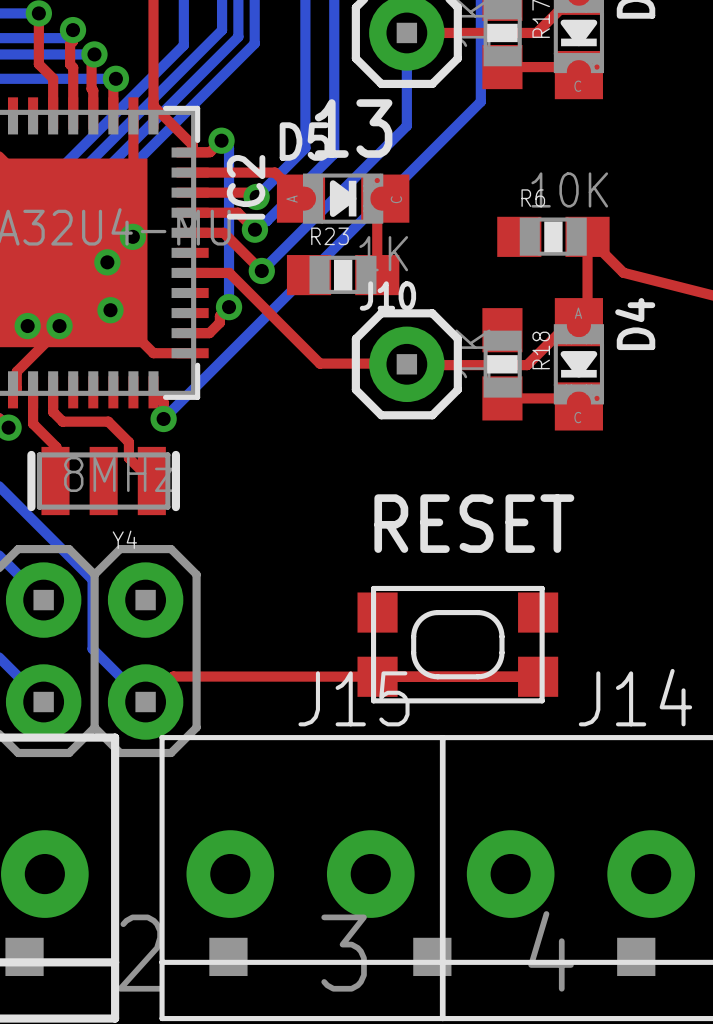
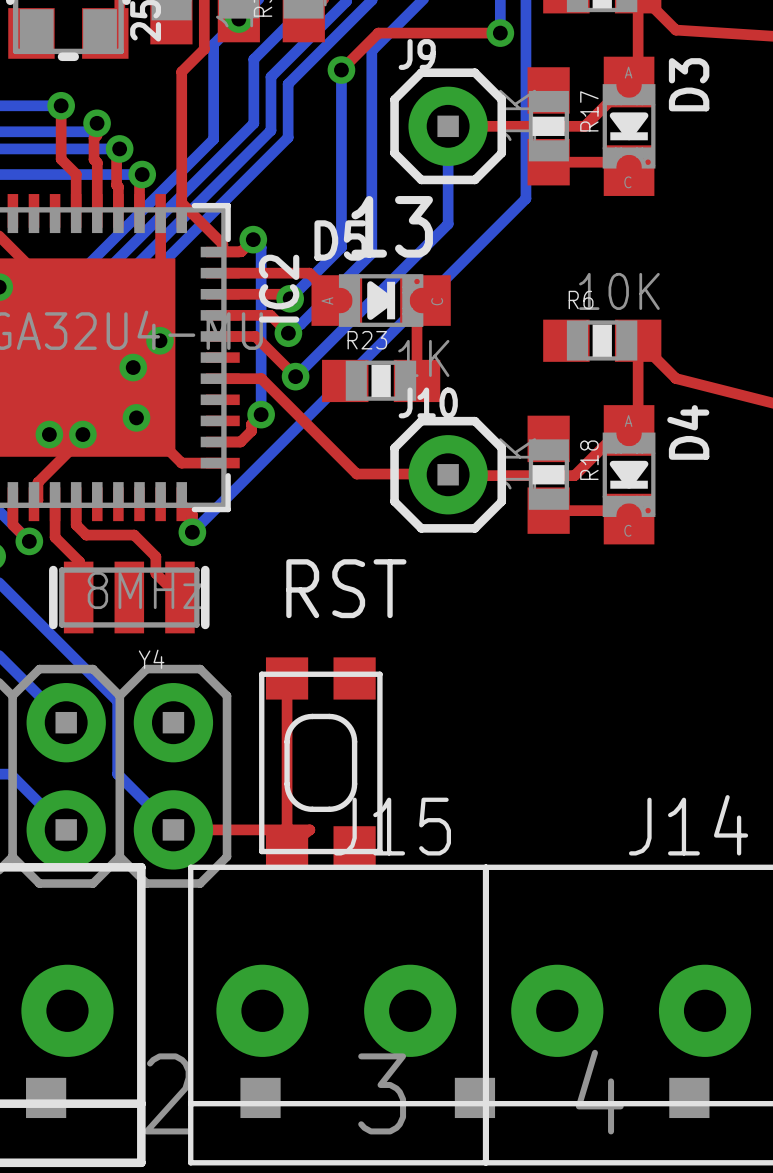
text: RESET (474, 523) -> RST (346, 588)
part rotation: 0° (457, 644) -> 90° clockwise (320, 762)
part position: (457, 644) -> (320, 762)
top track: (377, 676) (538, 676) (173, 676) (145, 702) -> (287, 678) (287, 847) (309, 829) (173, 829)

